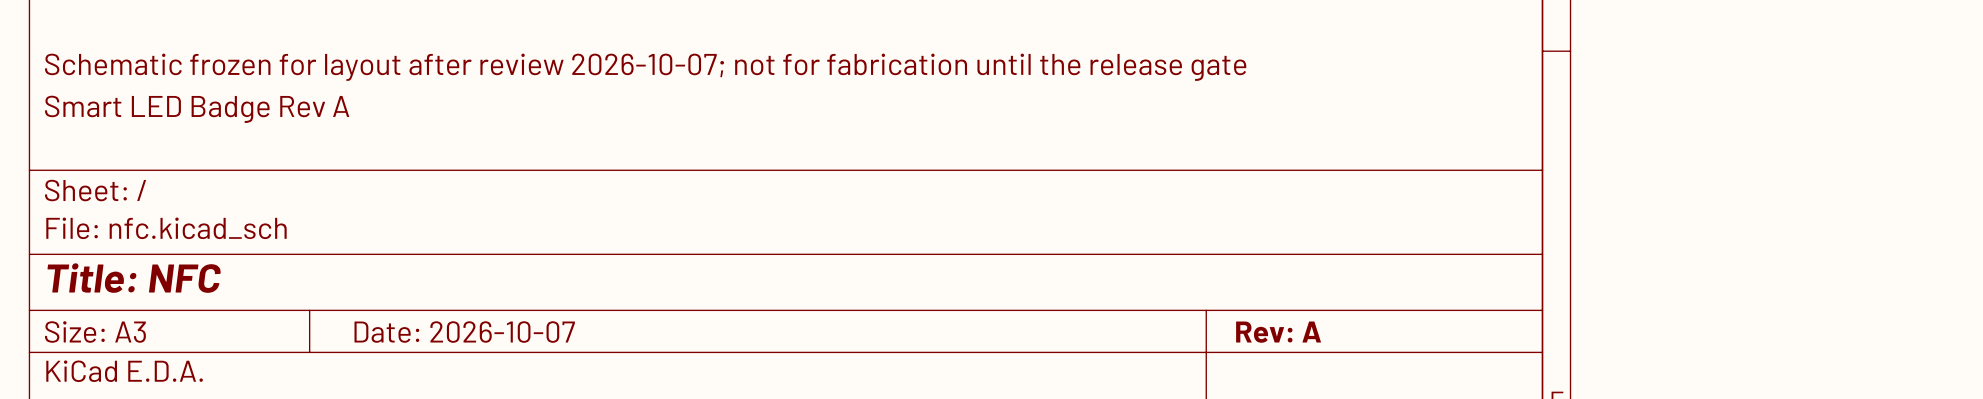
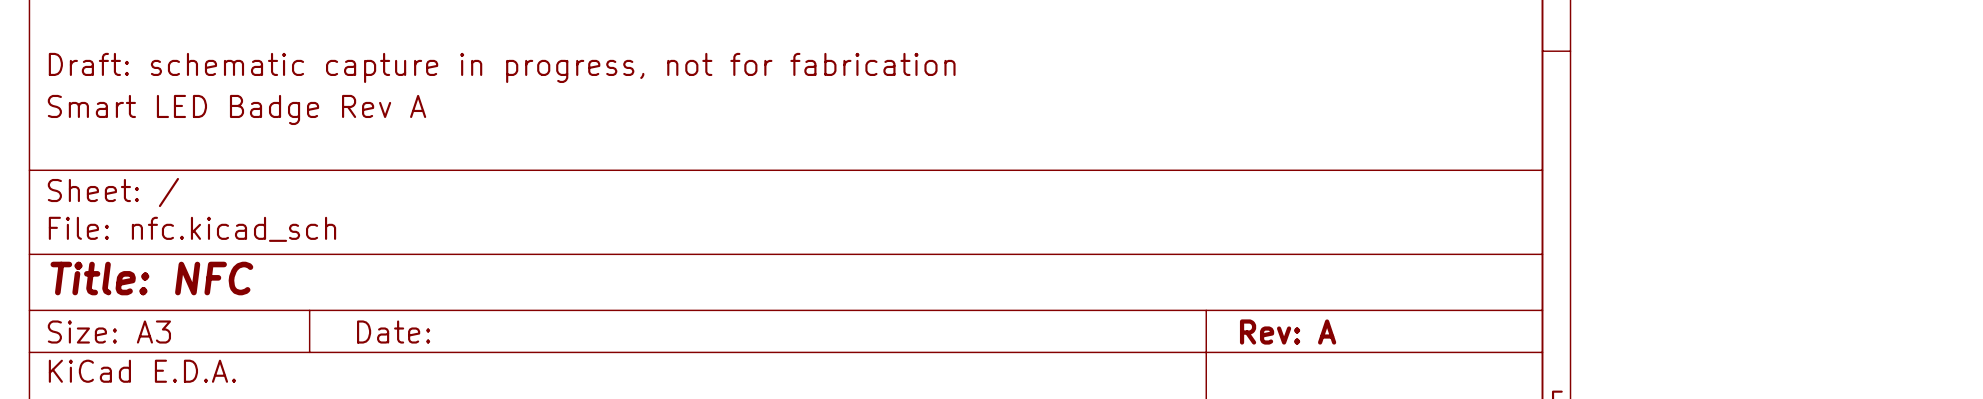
title block: Schematic frozen for layout after review 2026-10-07; not for fabrication until the release gate (645, 67) -> Draft: schematic capture in progress, not for fabrication (502, 67)
title block: Date: 2026-10-07 (464, 332) -> Date: (393, 332)

